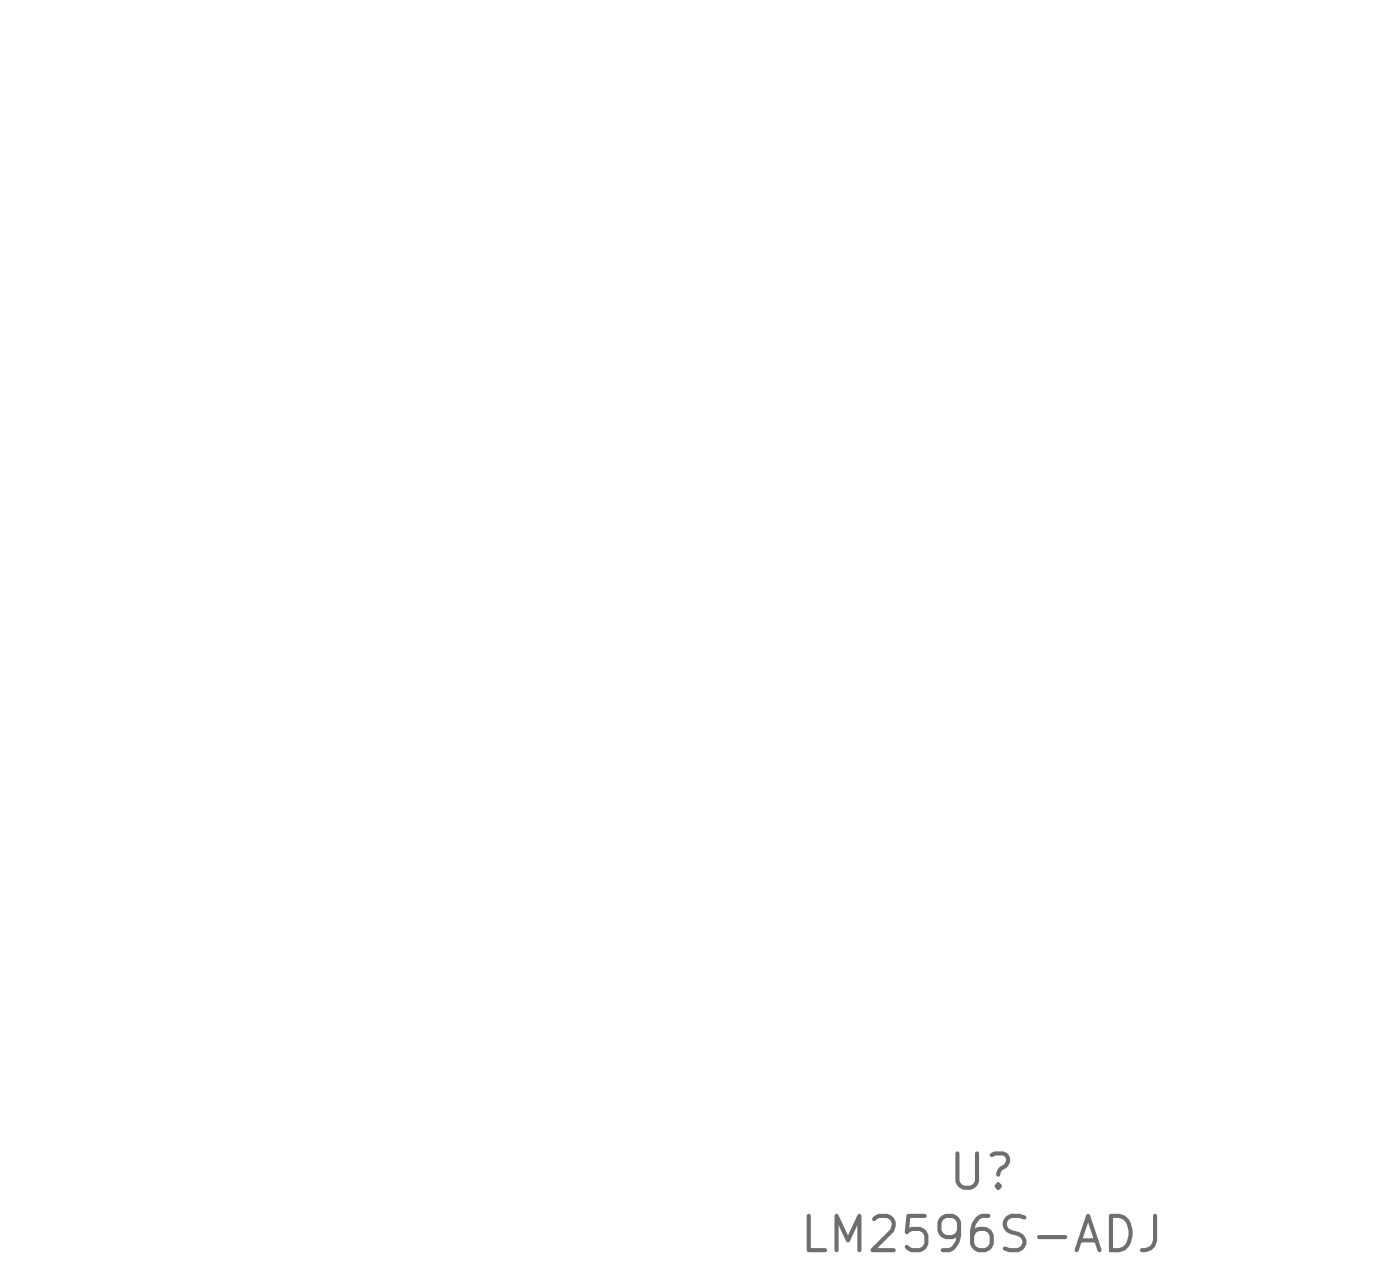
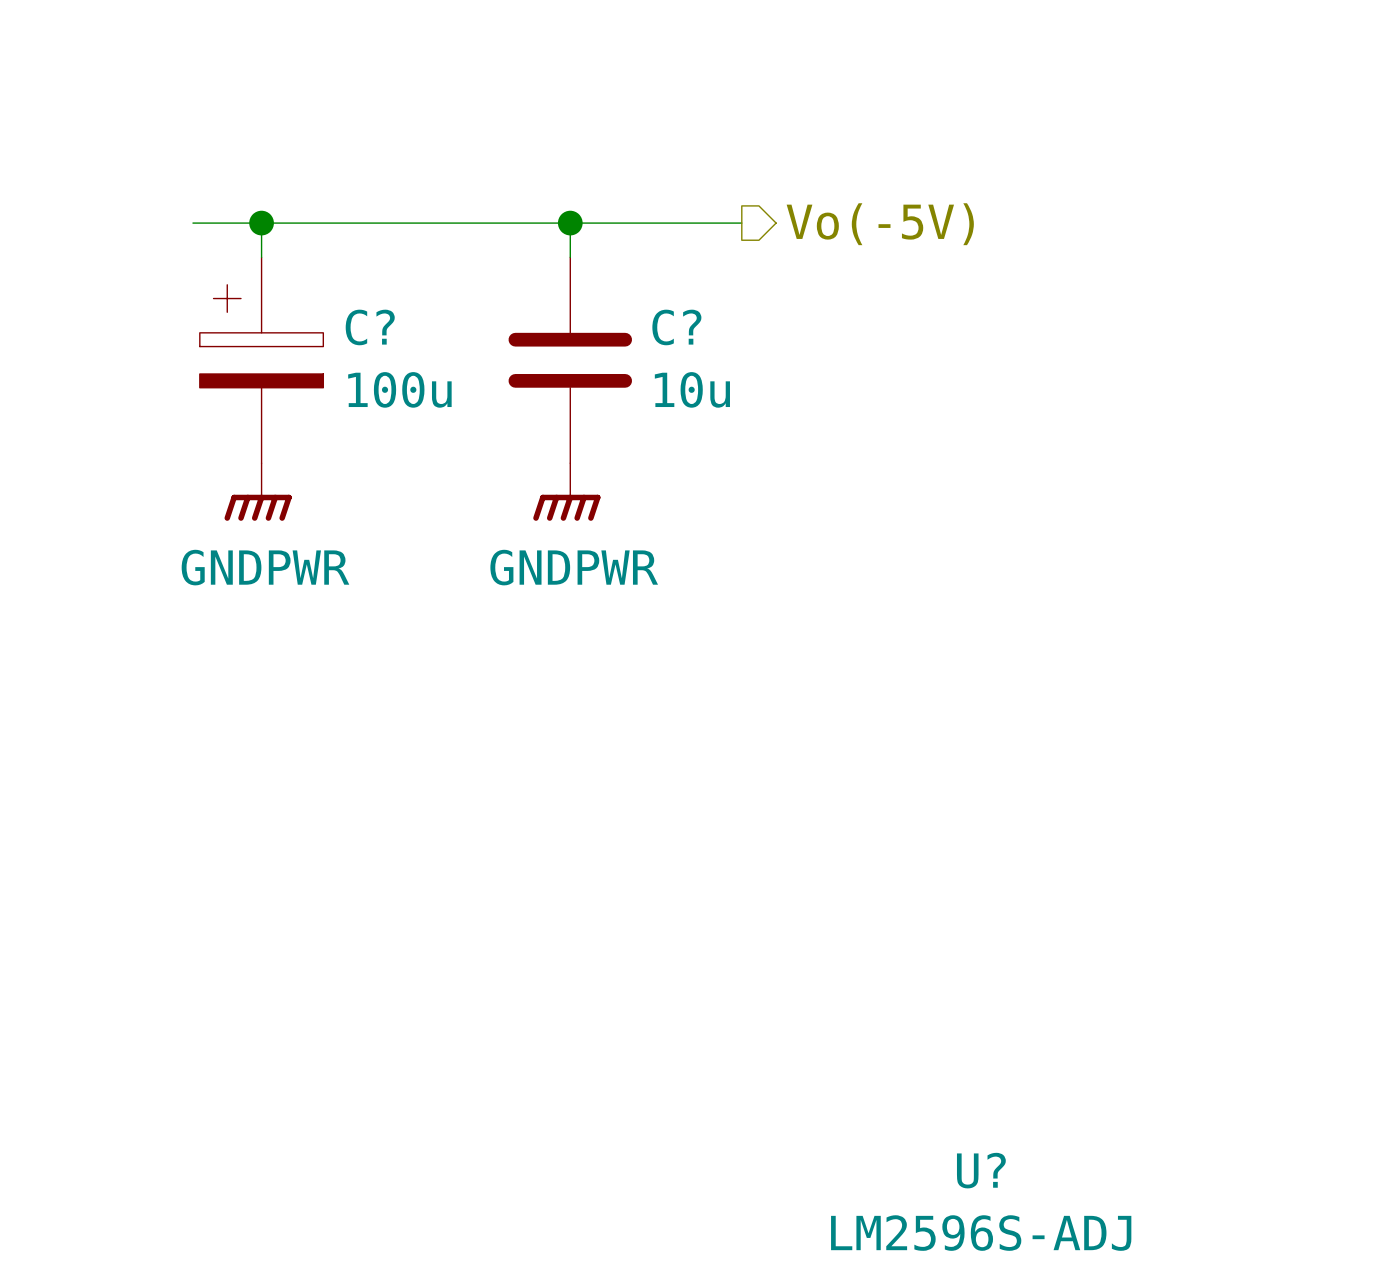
wire: none -> (192, 223) (741, 223)
wire: none -> (261, 223) (261, 257)
junction: none -> (261, 223)
wire: none -> (570, 223) (570, 257)
junction: none -> (570, 223)
hierarchical label: none -> Vo(-5V) (880, 224)
C?: none -> 100u (261, 360)
C?: none -> 10u (570, 360)
power symbol: none -> GNDPWR (258, 492)
power symbol: none -> GNDPWR (566, 492)

